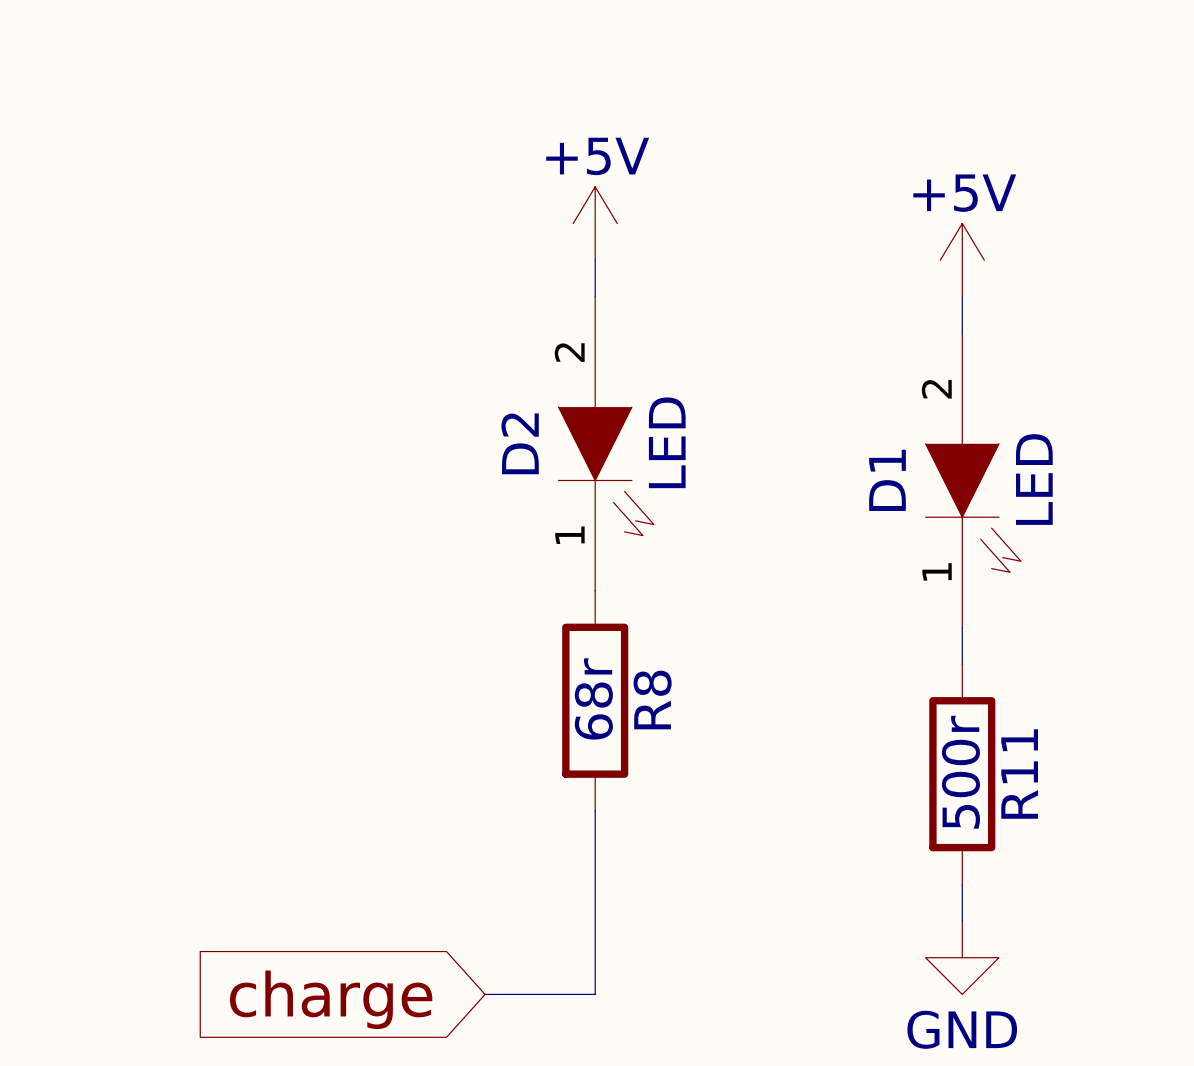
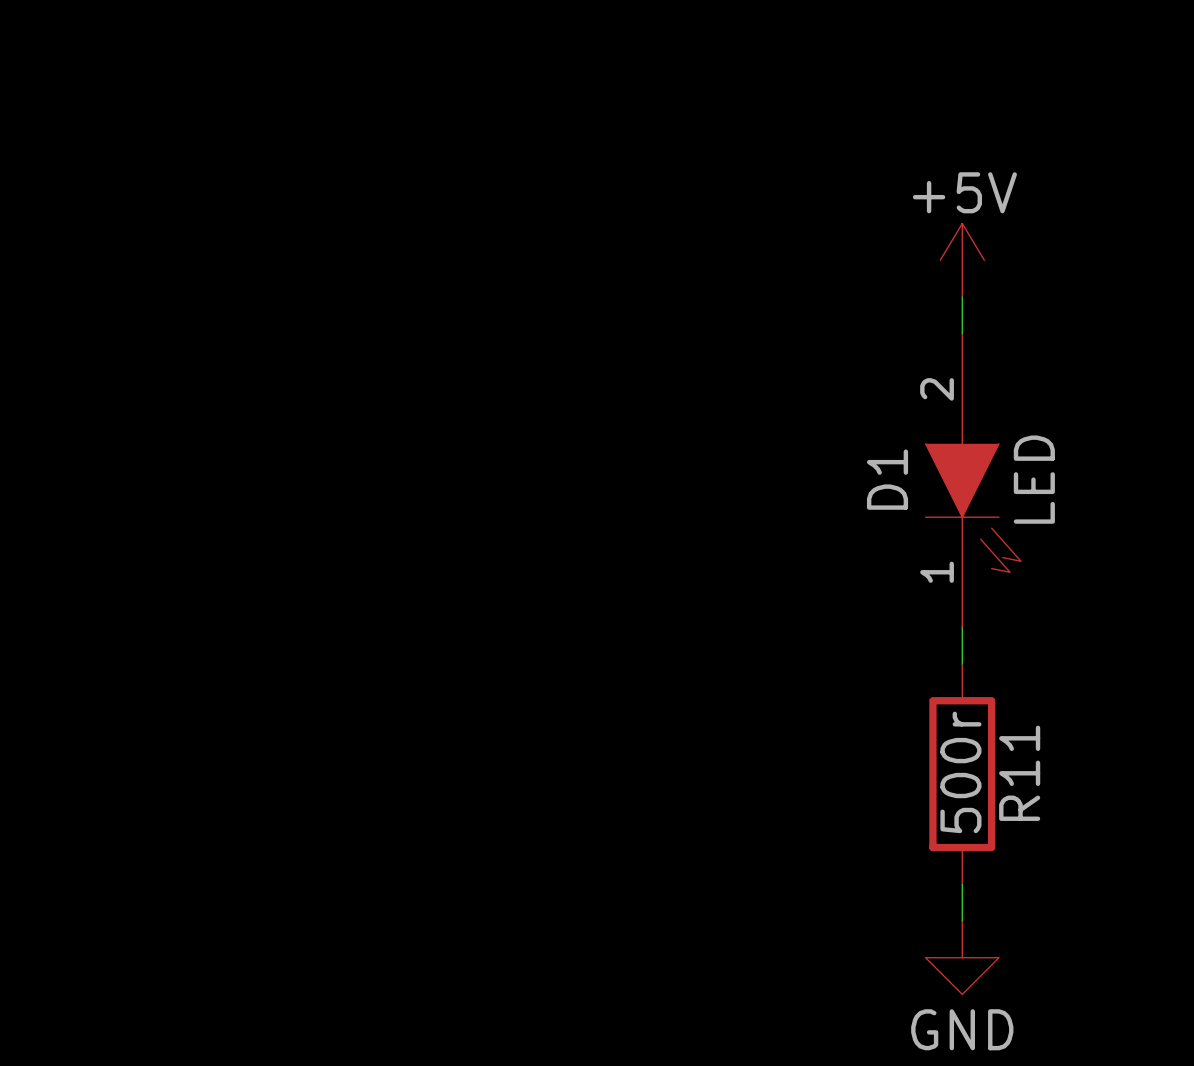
power symbol: +5V (595, 223) -> none
wire: (595, 260) (595, 296) -> none
D2: LED (606, 443) -> none
R8: 68r (595, 700) -> none
wire: (595, 810) (595, 994) (485, 994) -> none
global label: charge (331, 999) -> none

